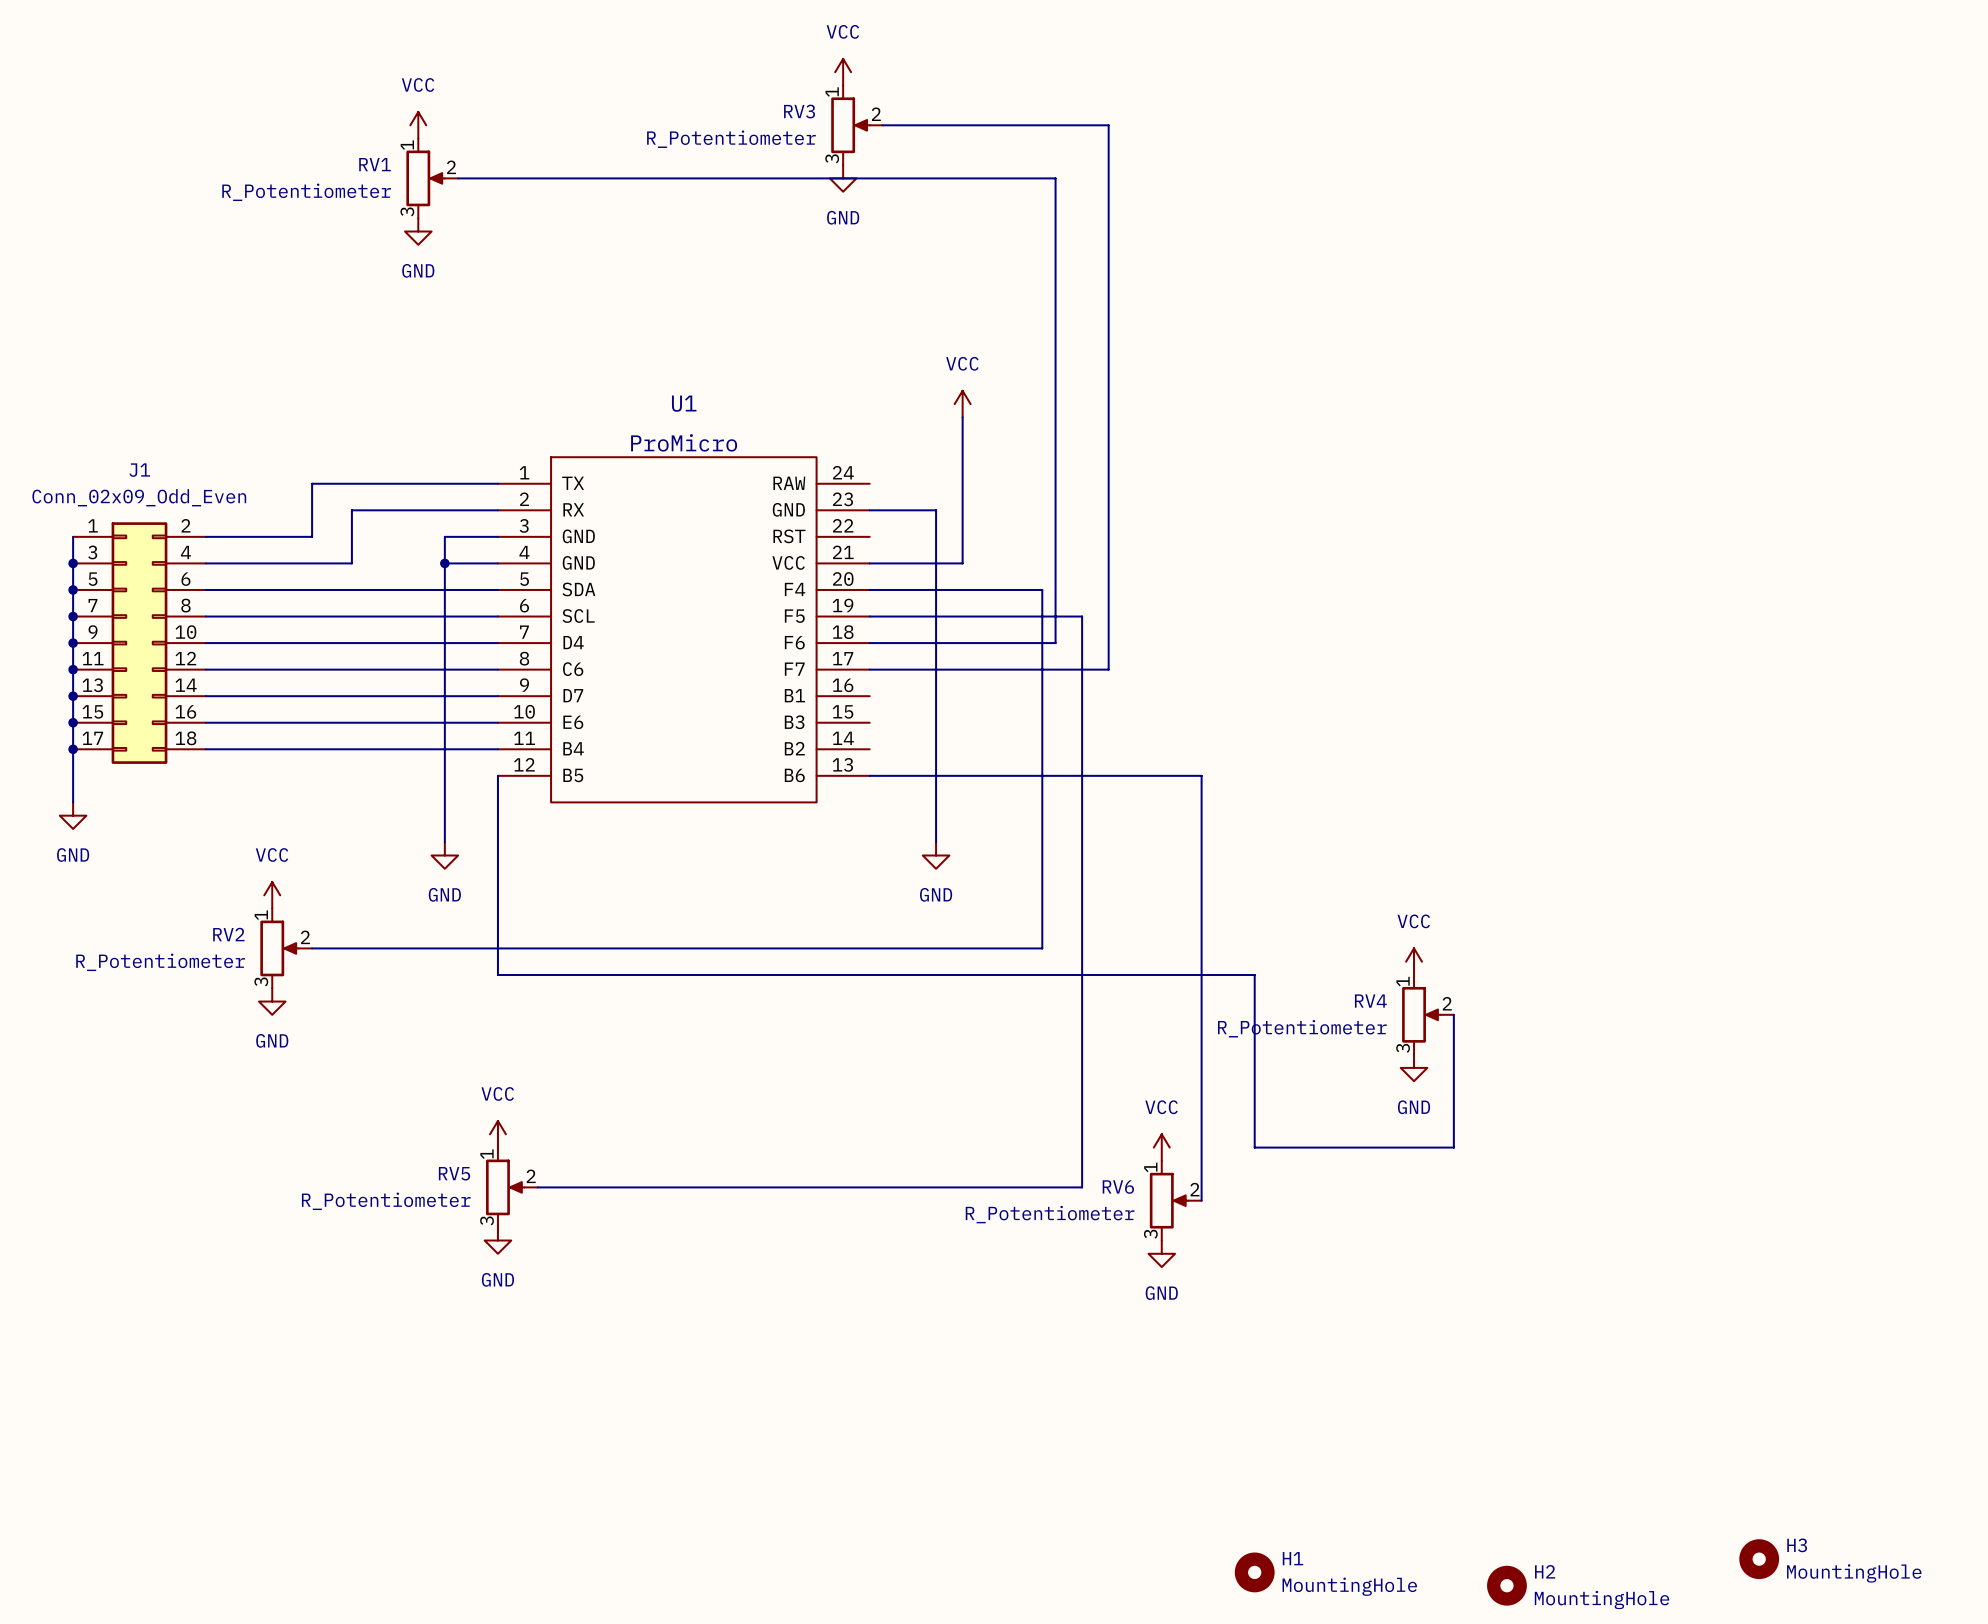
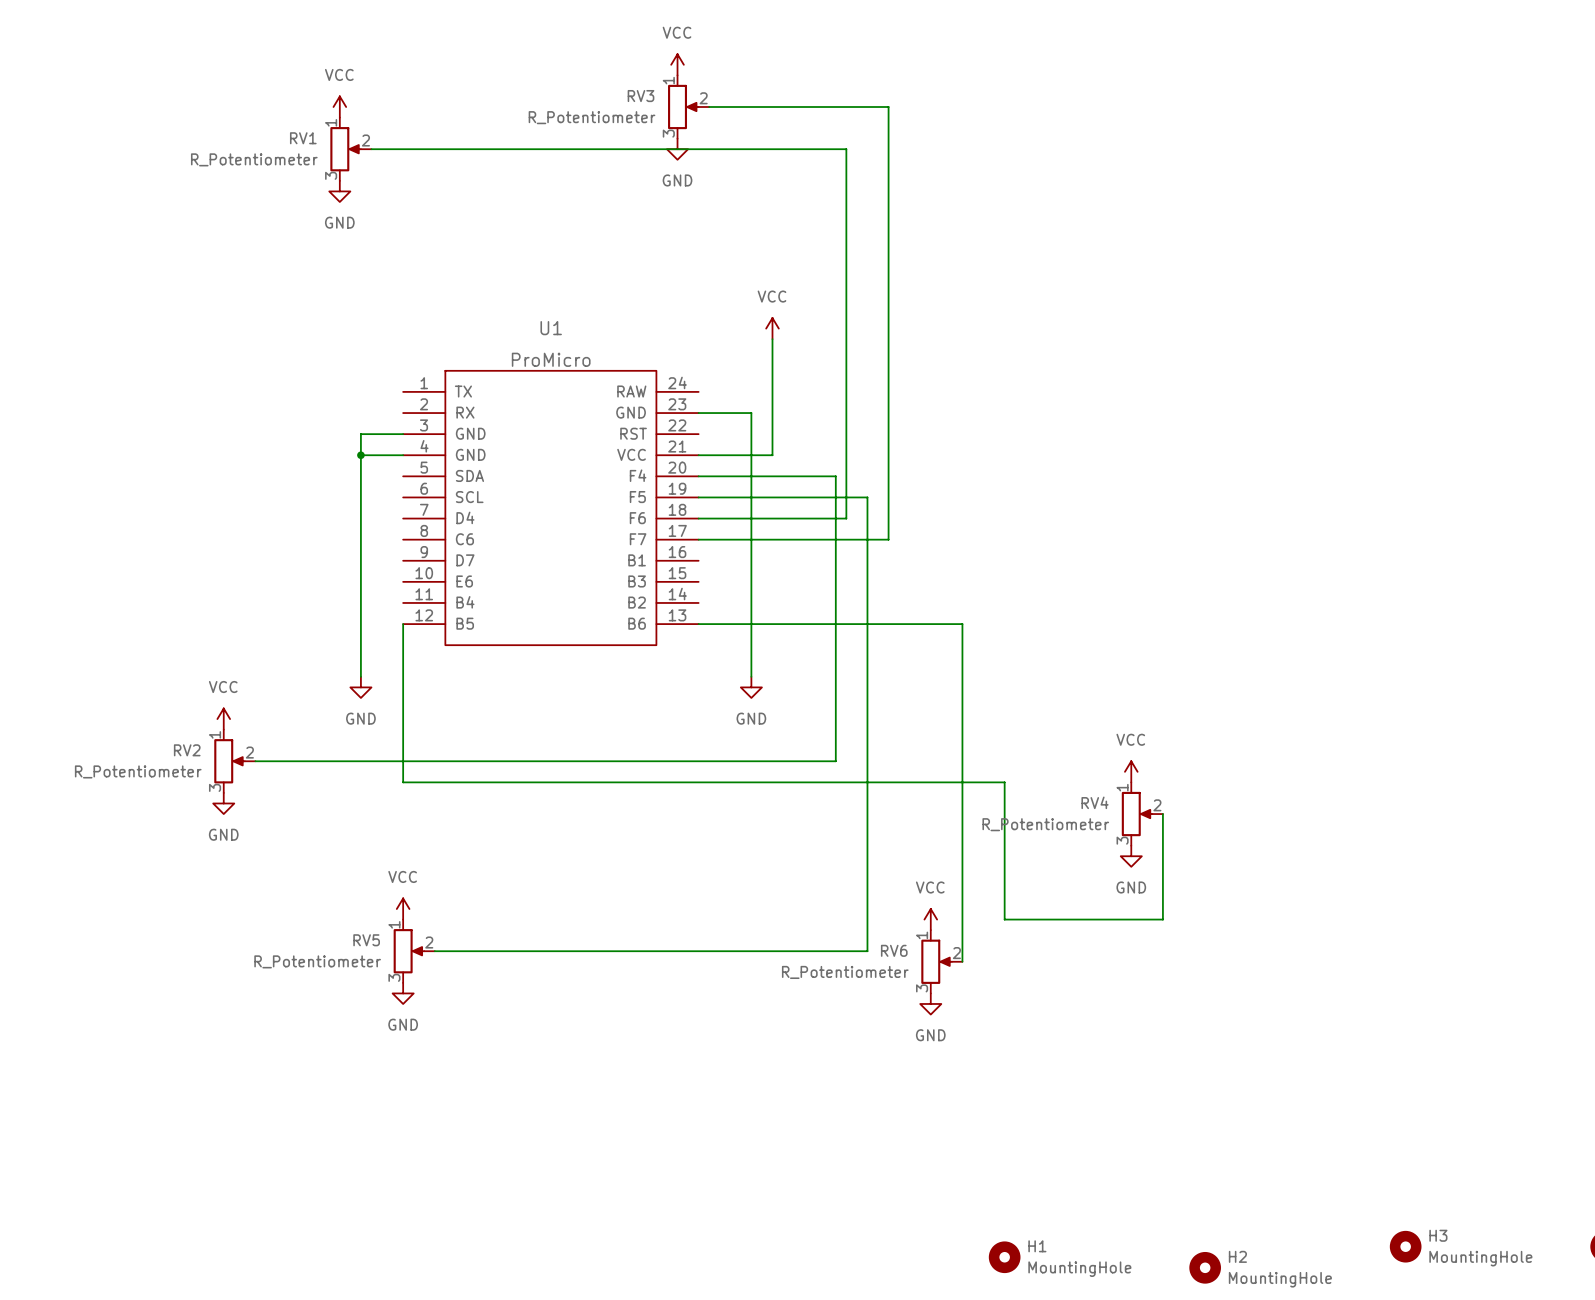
wire: (497, 483) (312, 483) (312, 536) (205, 536) -> none
wire: (497, 510) (351, 510) (351, 563) (205, 563) -> none
wire: (73, 536) (73, 802) -> none
junction: (73, 563) -> none
junction: (73, 589) -> none
wire: (205, 589) (497, 589) -> none
junction: (73, 616) -> none
wire: (205, 616) (497, 616) -> none
junction: (73, 643) -> none
J1: Conn_02x09_Odd_Even (139, 643) -> none
wire: (205, 643) (497, 643) -> none
junction: (73, 669) -> none
wire: (205, 669) (497, 669) -> none
junction: (73, 696) -> none
wire: (205, 696) (497, 696) -> none
junction: (73, 722) -> none
wire: (205, 722) (497, 722) -> none
junction: (73, 749) -> none
wire: (205, 749) (497, 749) -> none
power symbol: GND (73, 815) -> none

